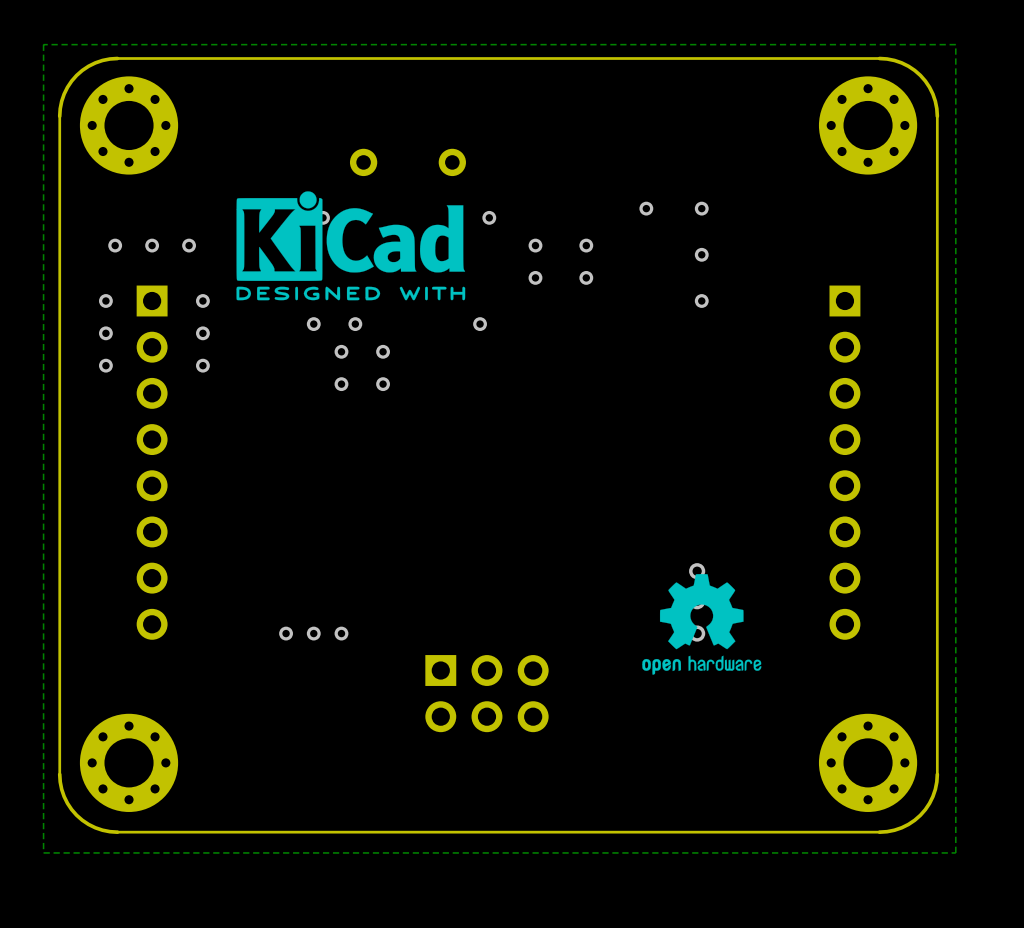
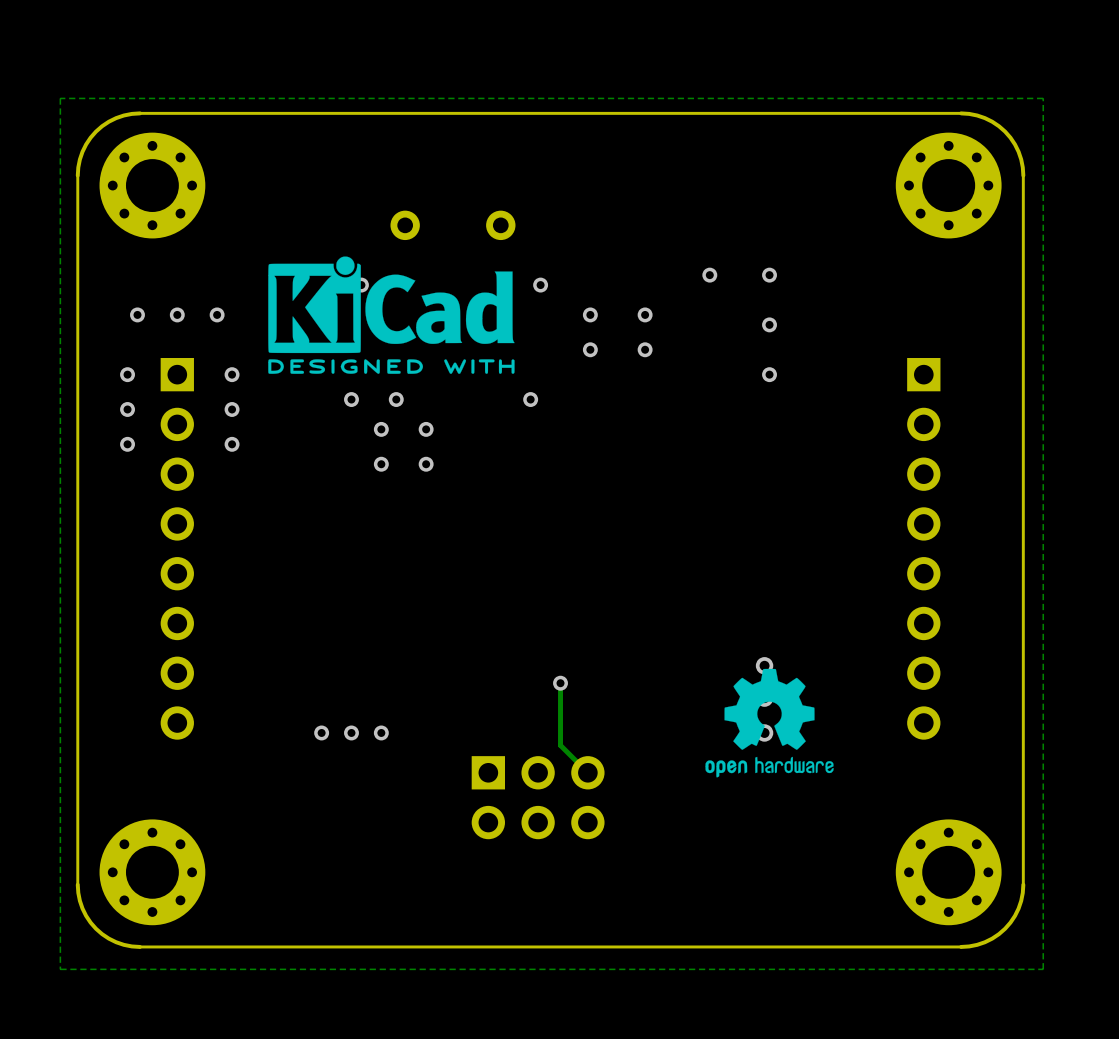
track: none -> (560, 683) (560, 745) (587, 772)
via: none -> (560, 683)

